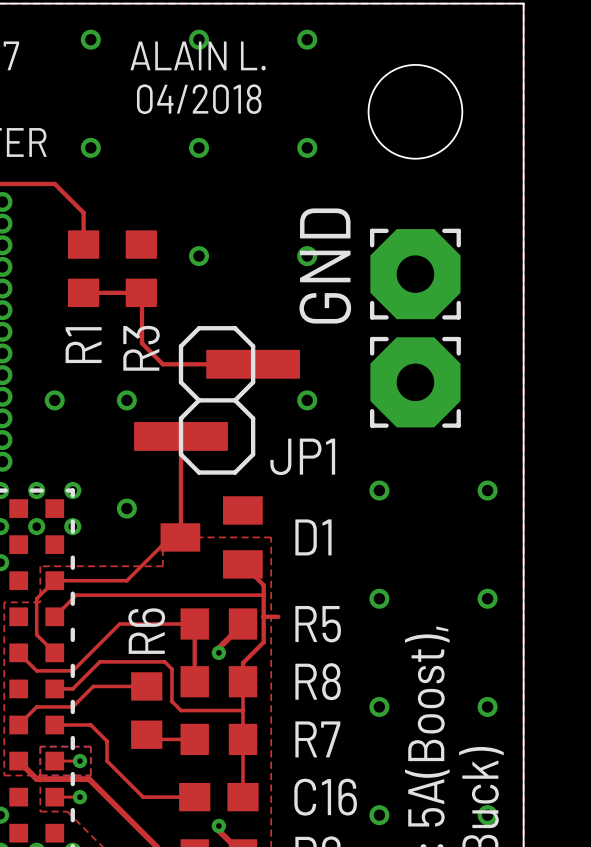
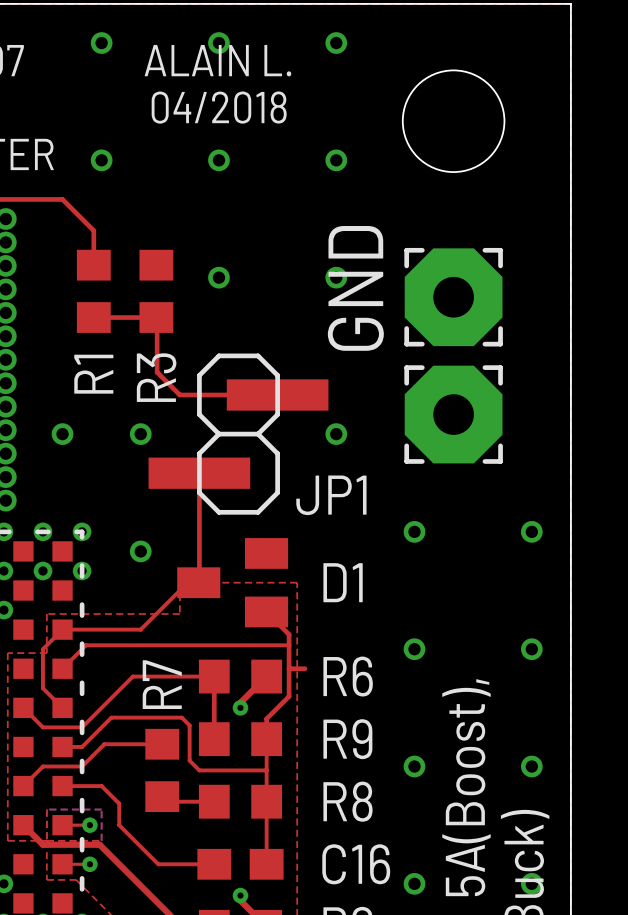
R5 name: R5 (318, 624) -> R6 (348, 676)
R6 name: R6 (146, 631) -> R7 (162, 684)
R8 name: R8 (318, 681) -> R9 (347, 739)
R7 name: R7 (317, 739) -> R8 (348, 801)

